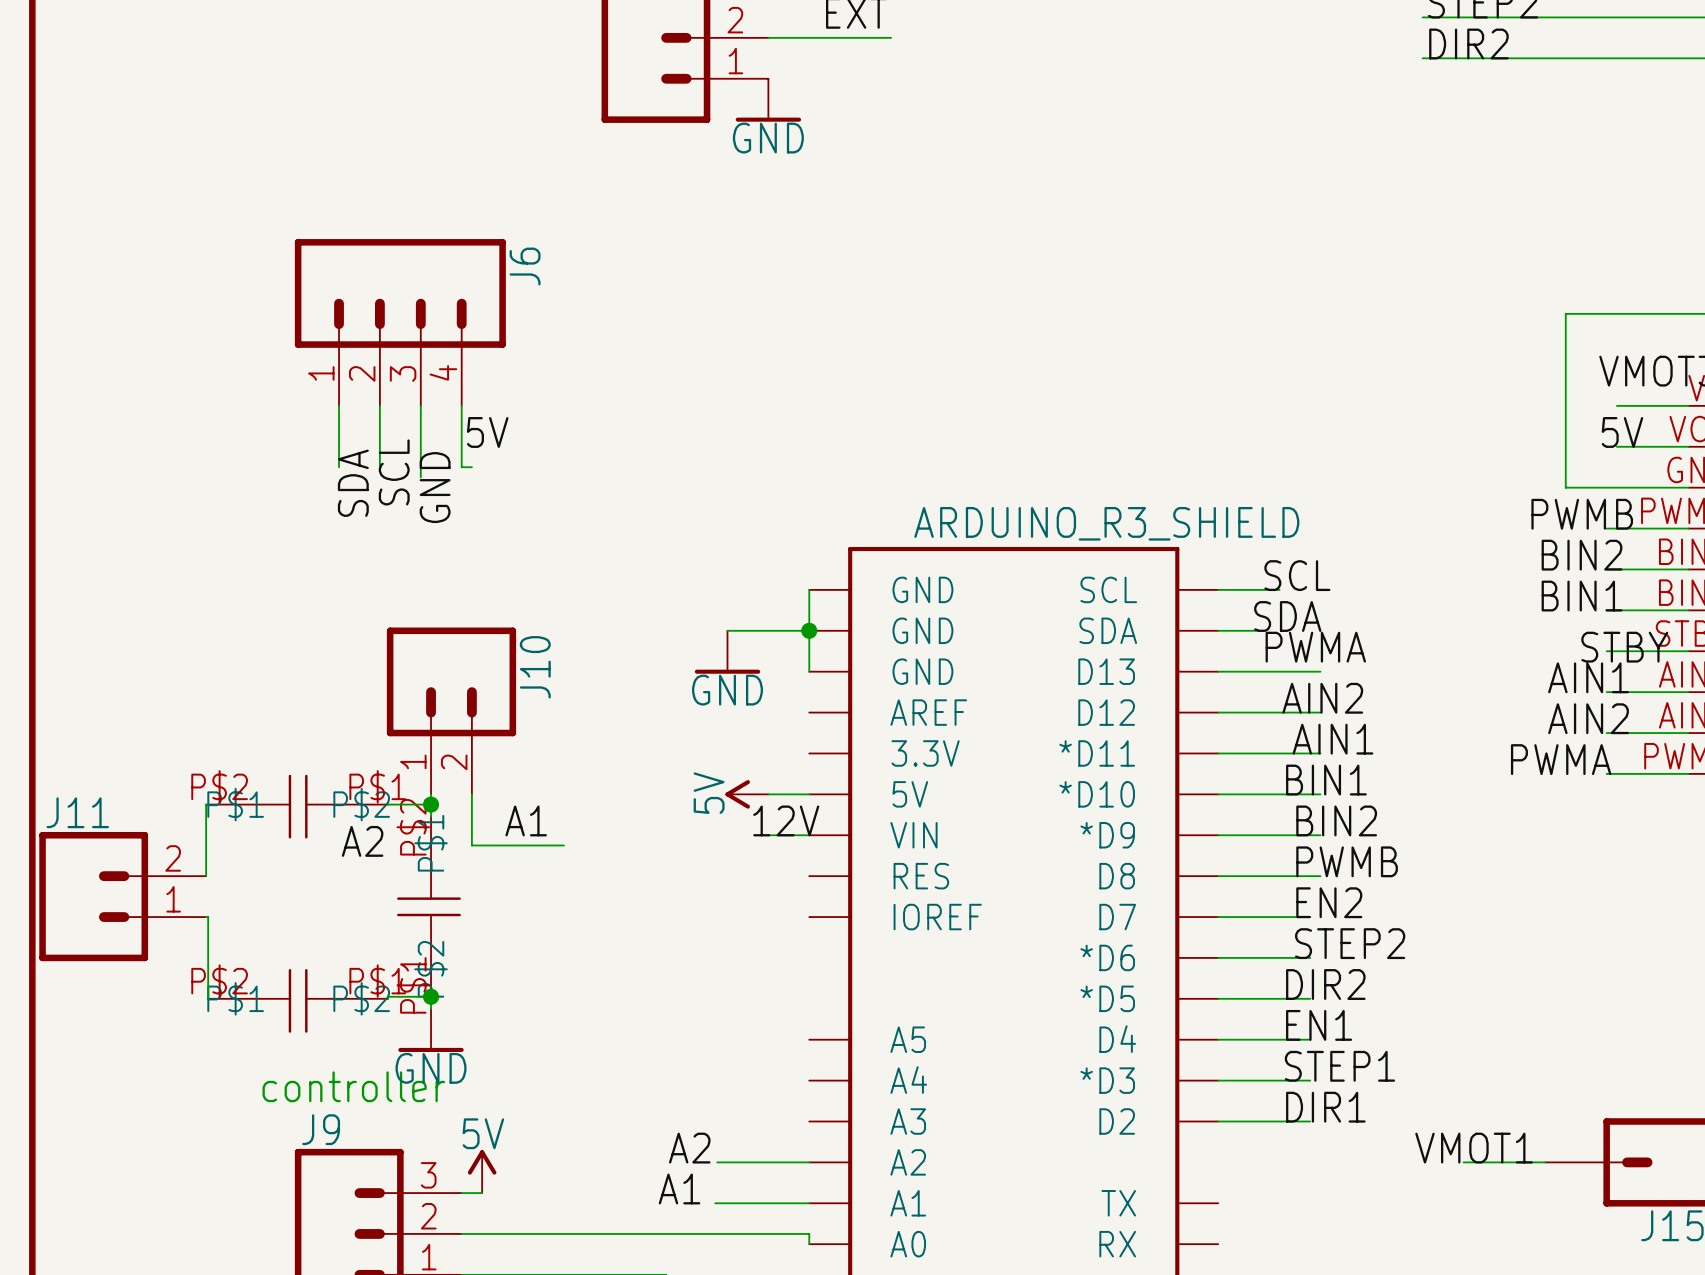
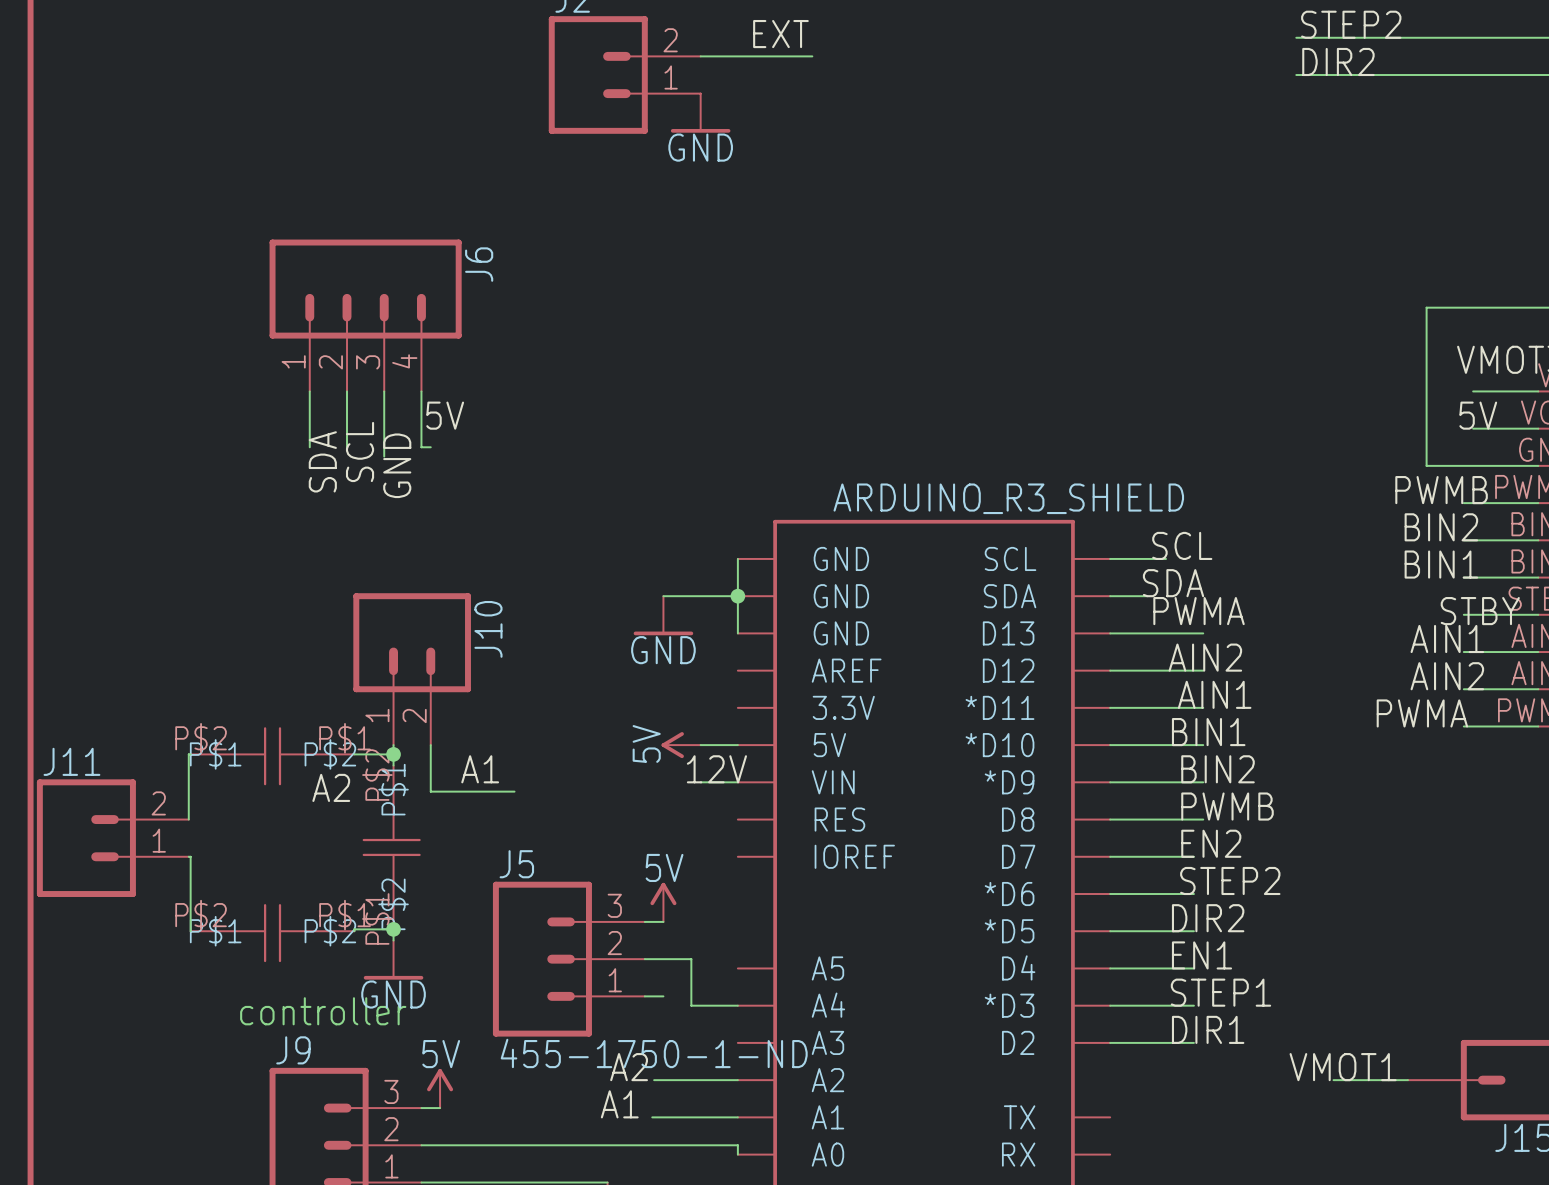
power symbol: none -> 5V (663, 902)
wire: none -> (644, 921) (663, 921)
J5: none -> 455-1750-1-ND (568, 959)
wire: none -> (644, 959) (691, 959) (691, 1005) (737, 1005)
wire: none -> (644, 996) (663, 996)

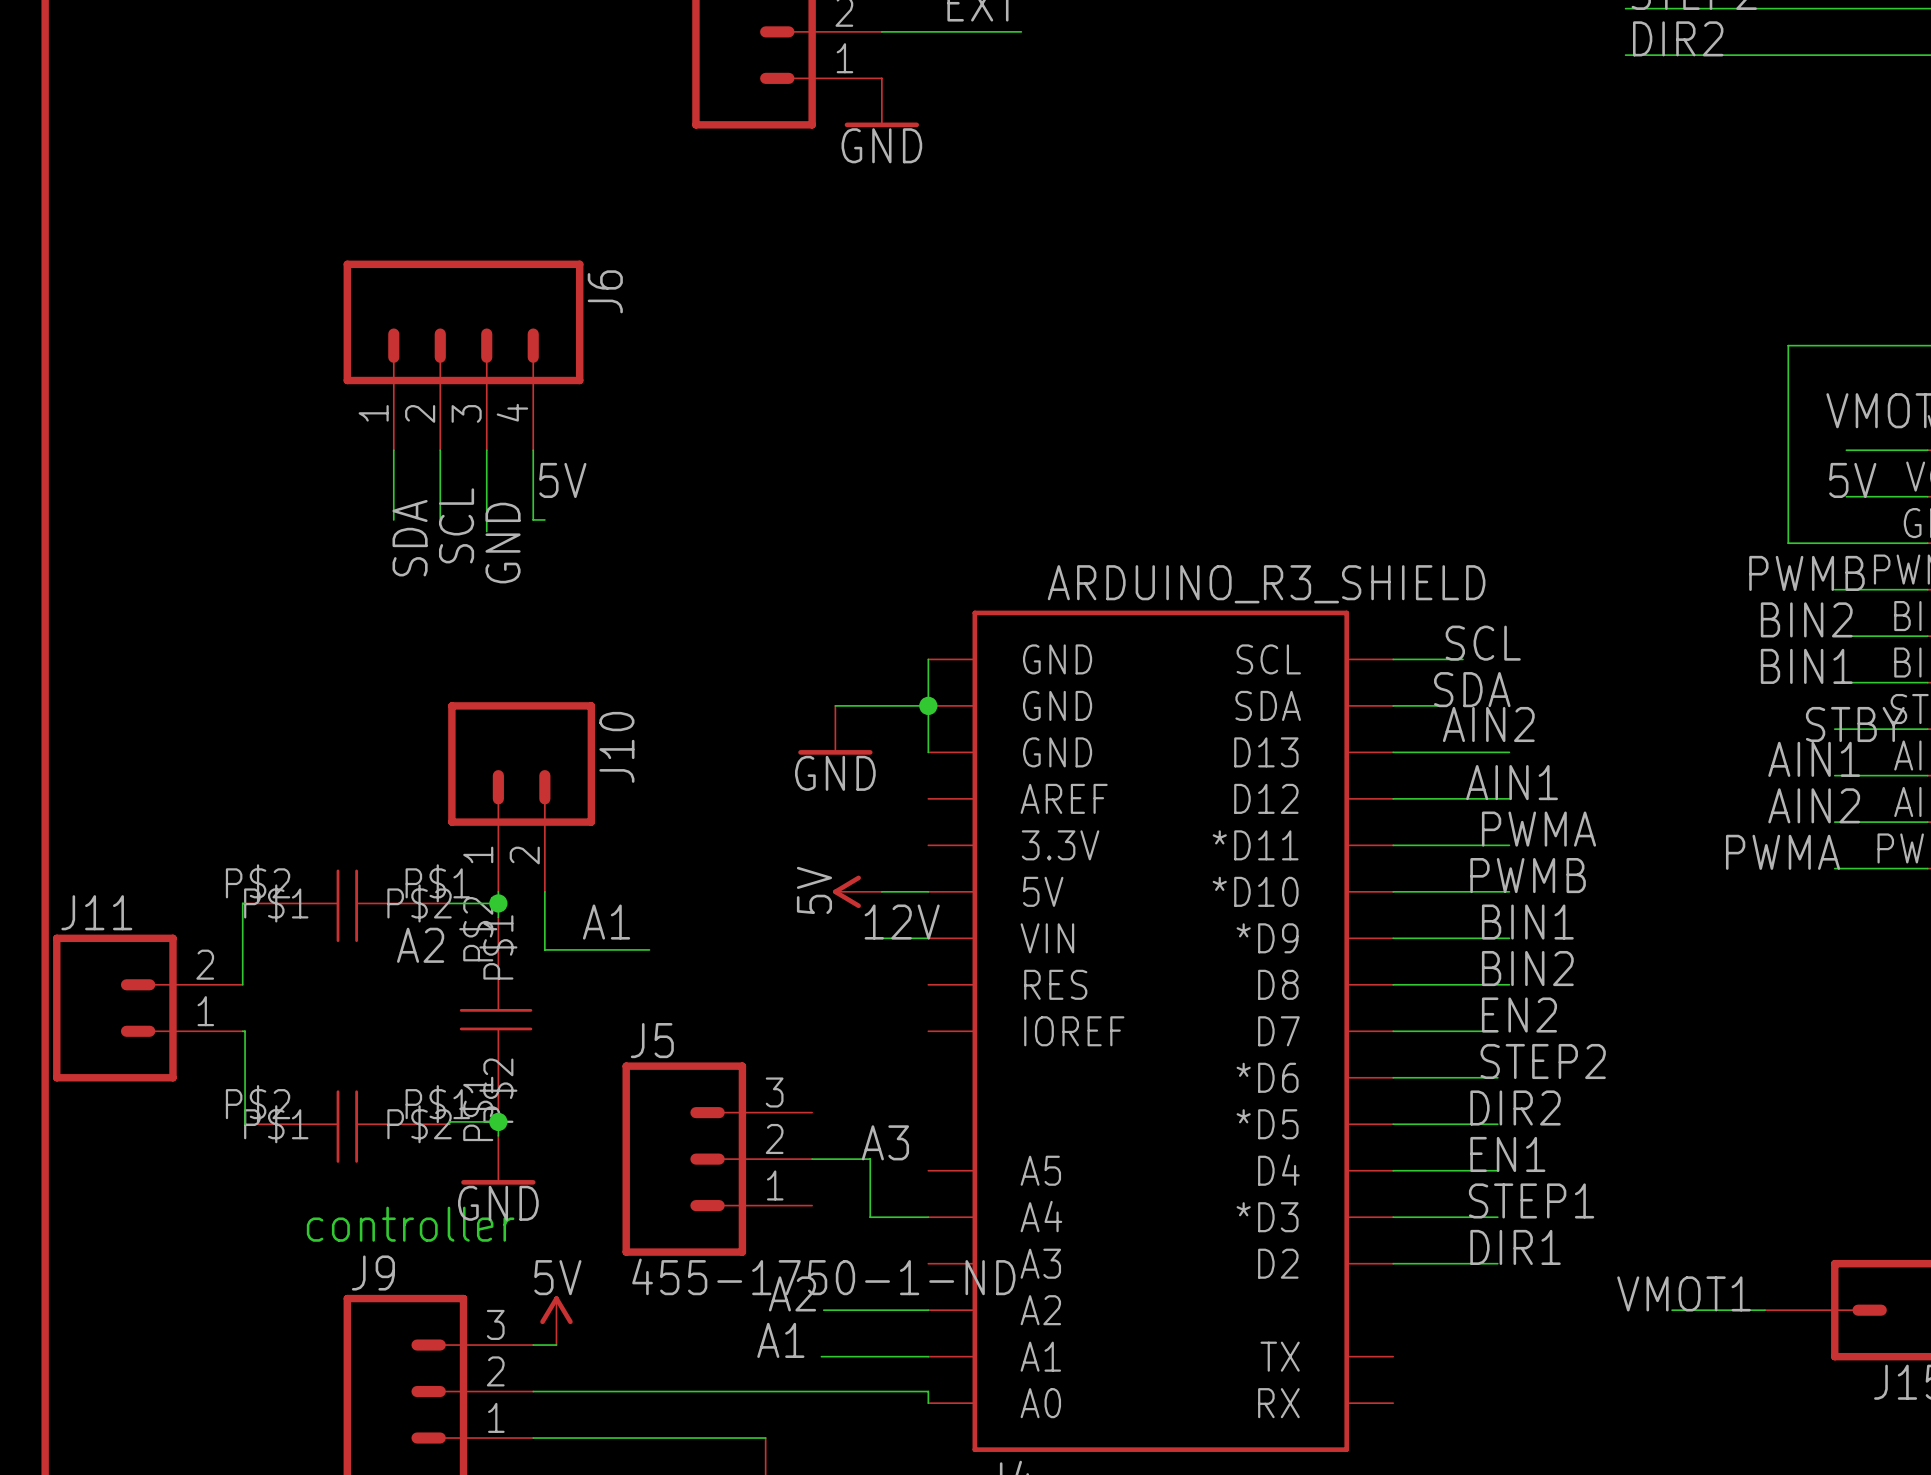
label: PWMA (1199, 611) -> AIN2 (1488, 724)
label: AIN2 (1205, 657) -> AIN1 (1512, 782)
label: AIN1 (1214, 694) -> PWMA (1539, 829)
label: BIN1 (1208, 732) -> PWMB (1528, 875)
label: BIN2 (1218, 769) -> BIN1 (1527, 922)
label: PWMB (1227, 806) -> BIN2 (1527, 968)
power symbol: 5V (663, 902) -> none
wire: (644, 921) (663, 921) -> none
label: none -> A3 (885, 1142)
wire: (644, 996) (663, 996) -> none

